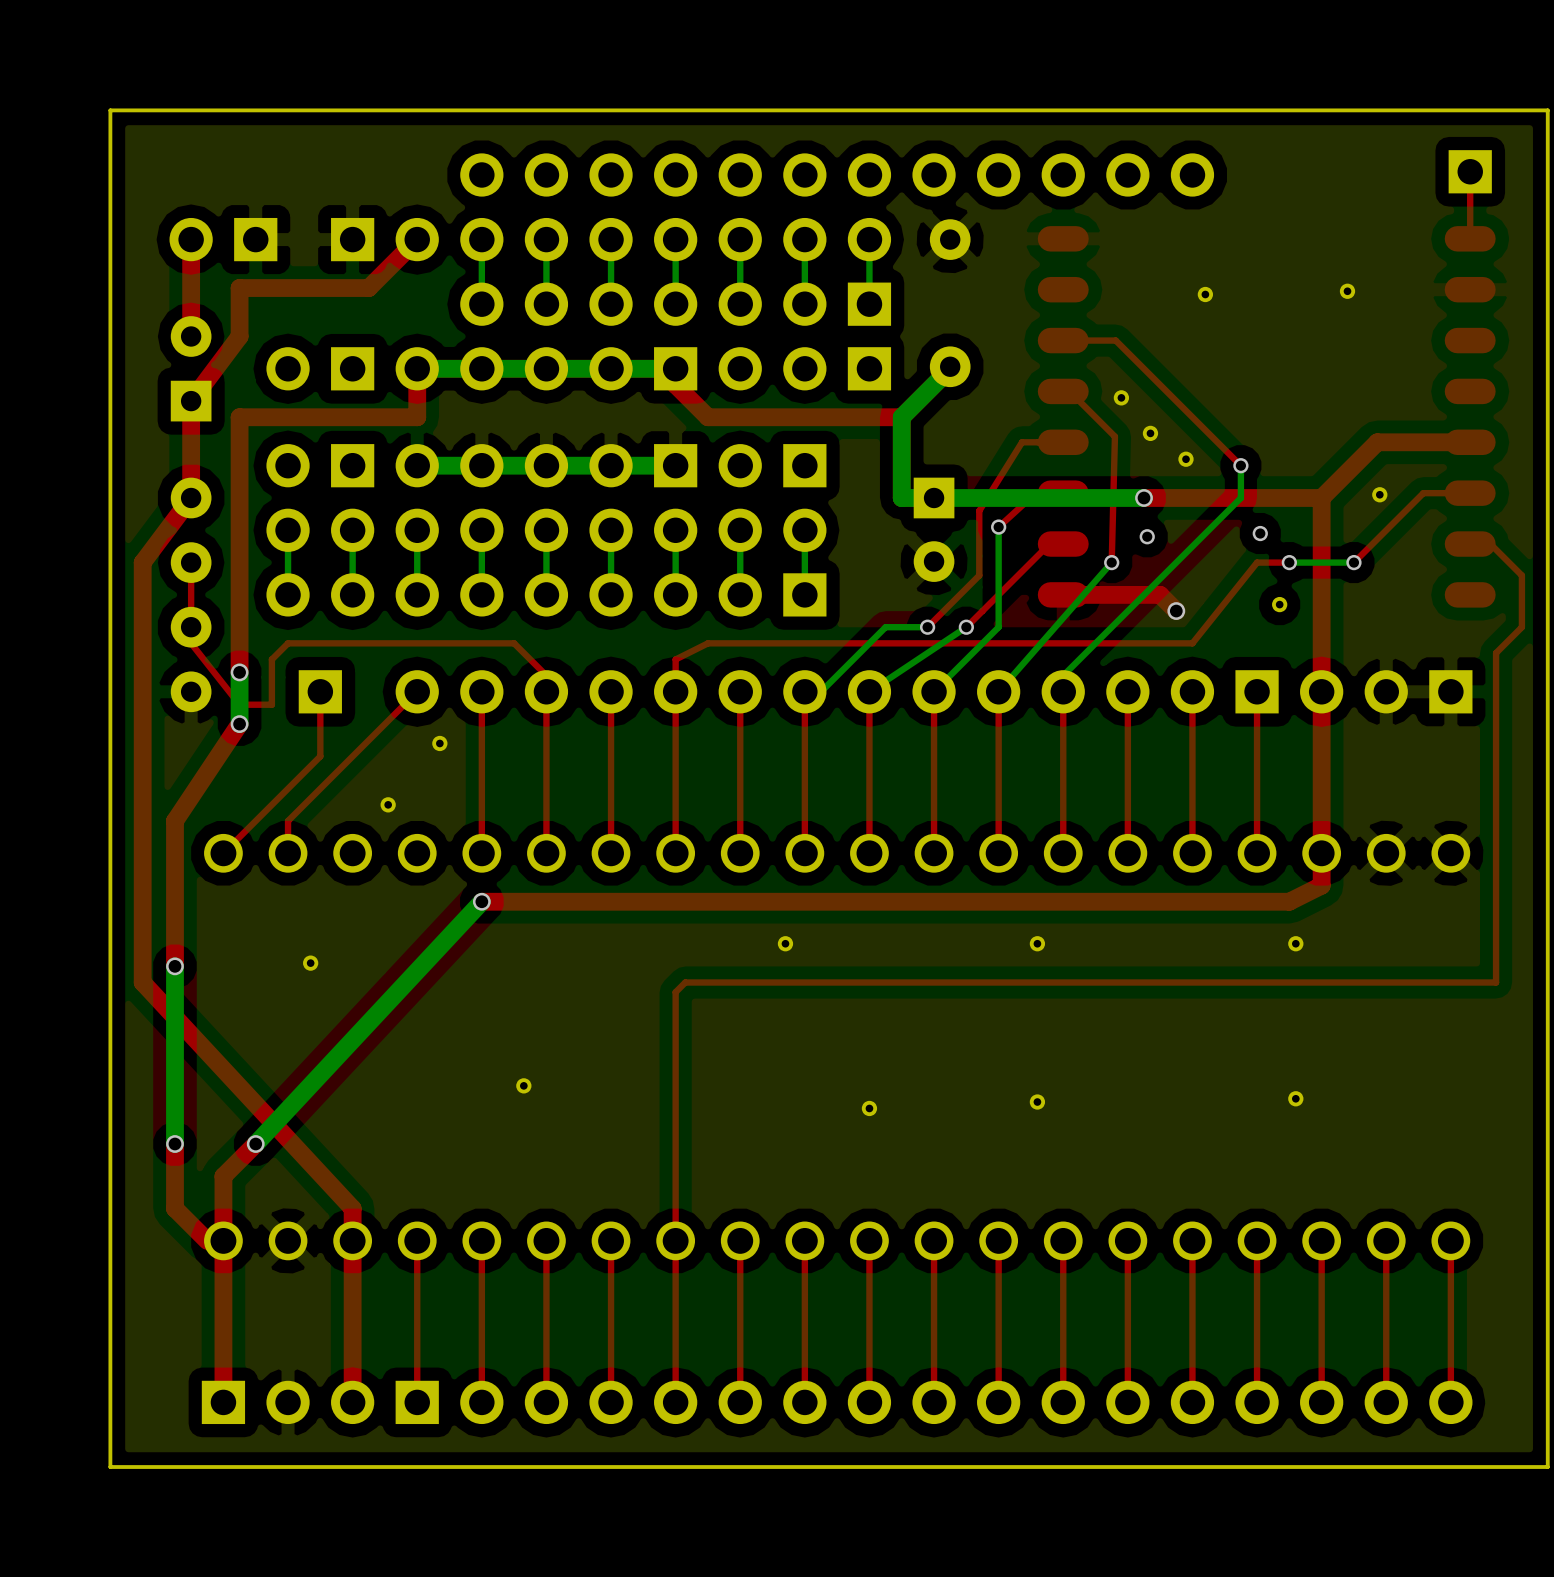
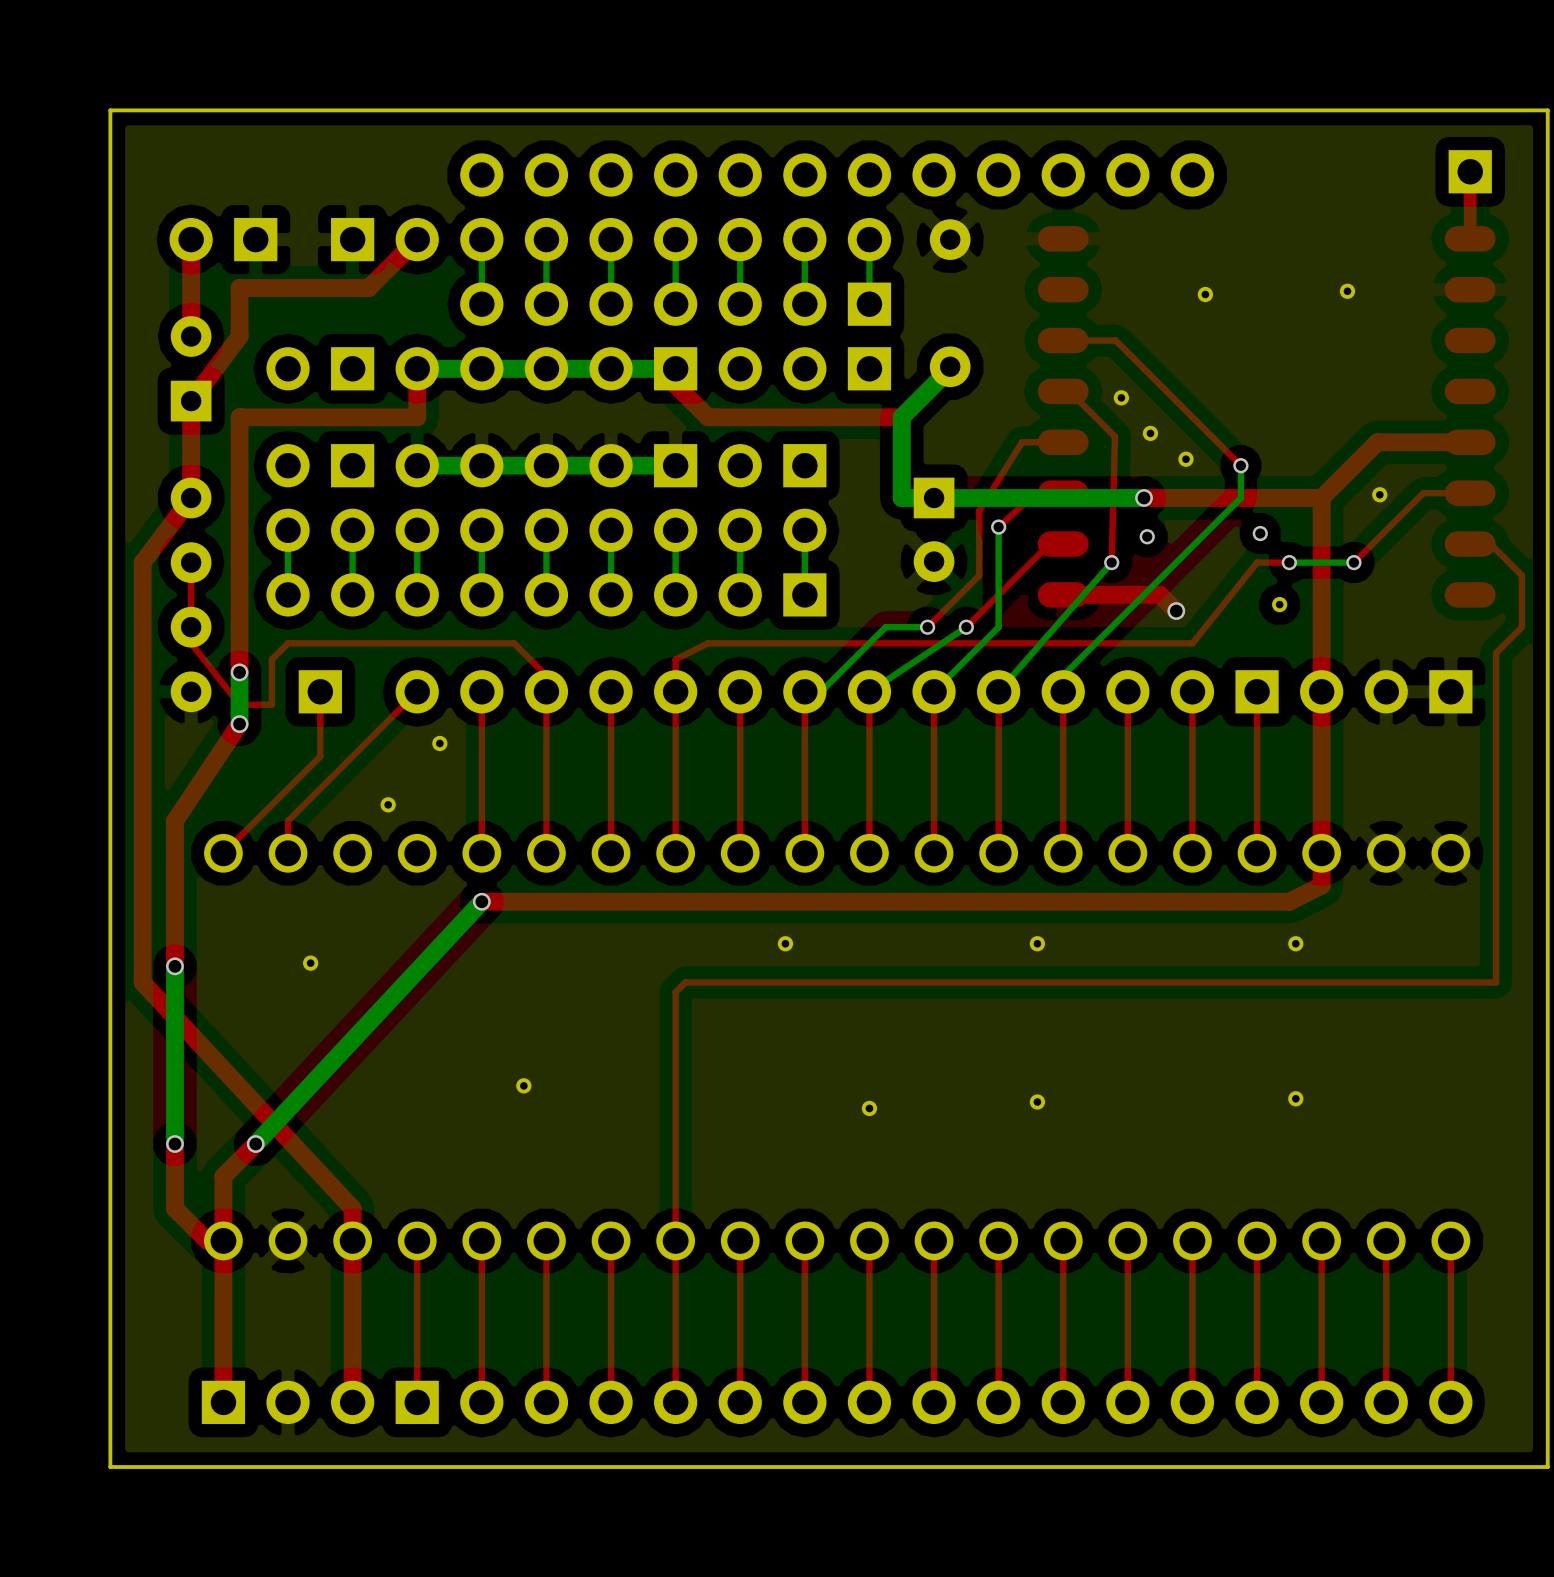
top track width: thin (1470, 171) (1470, 238) -> thick (1470, 171) (1470, 238)

